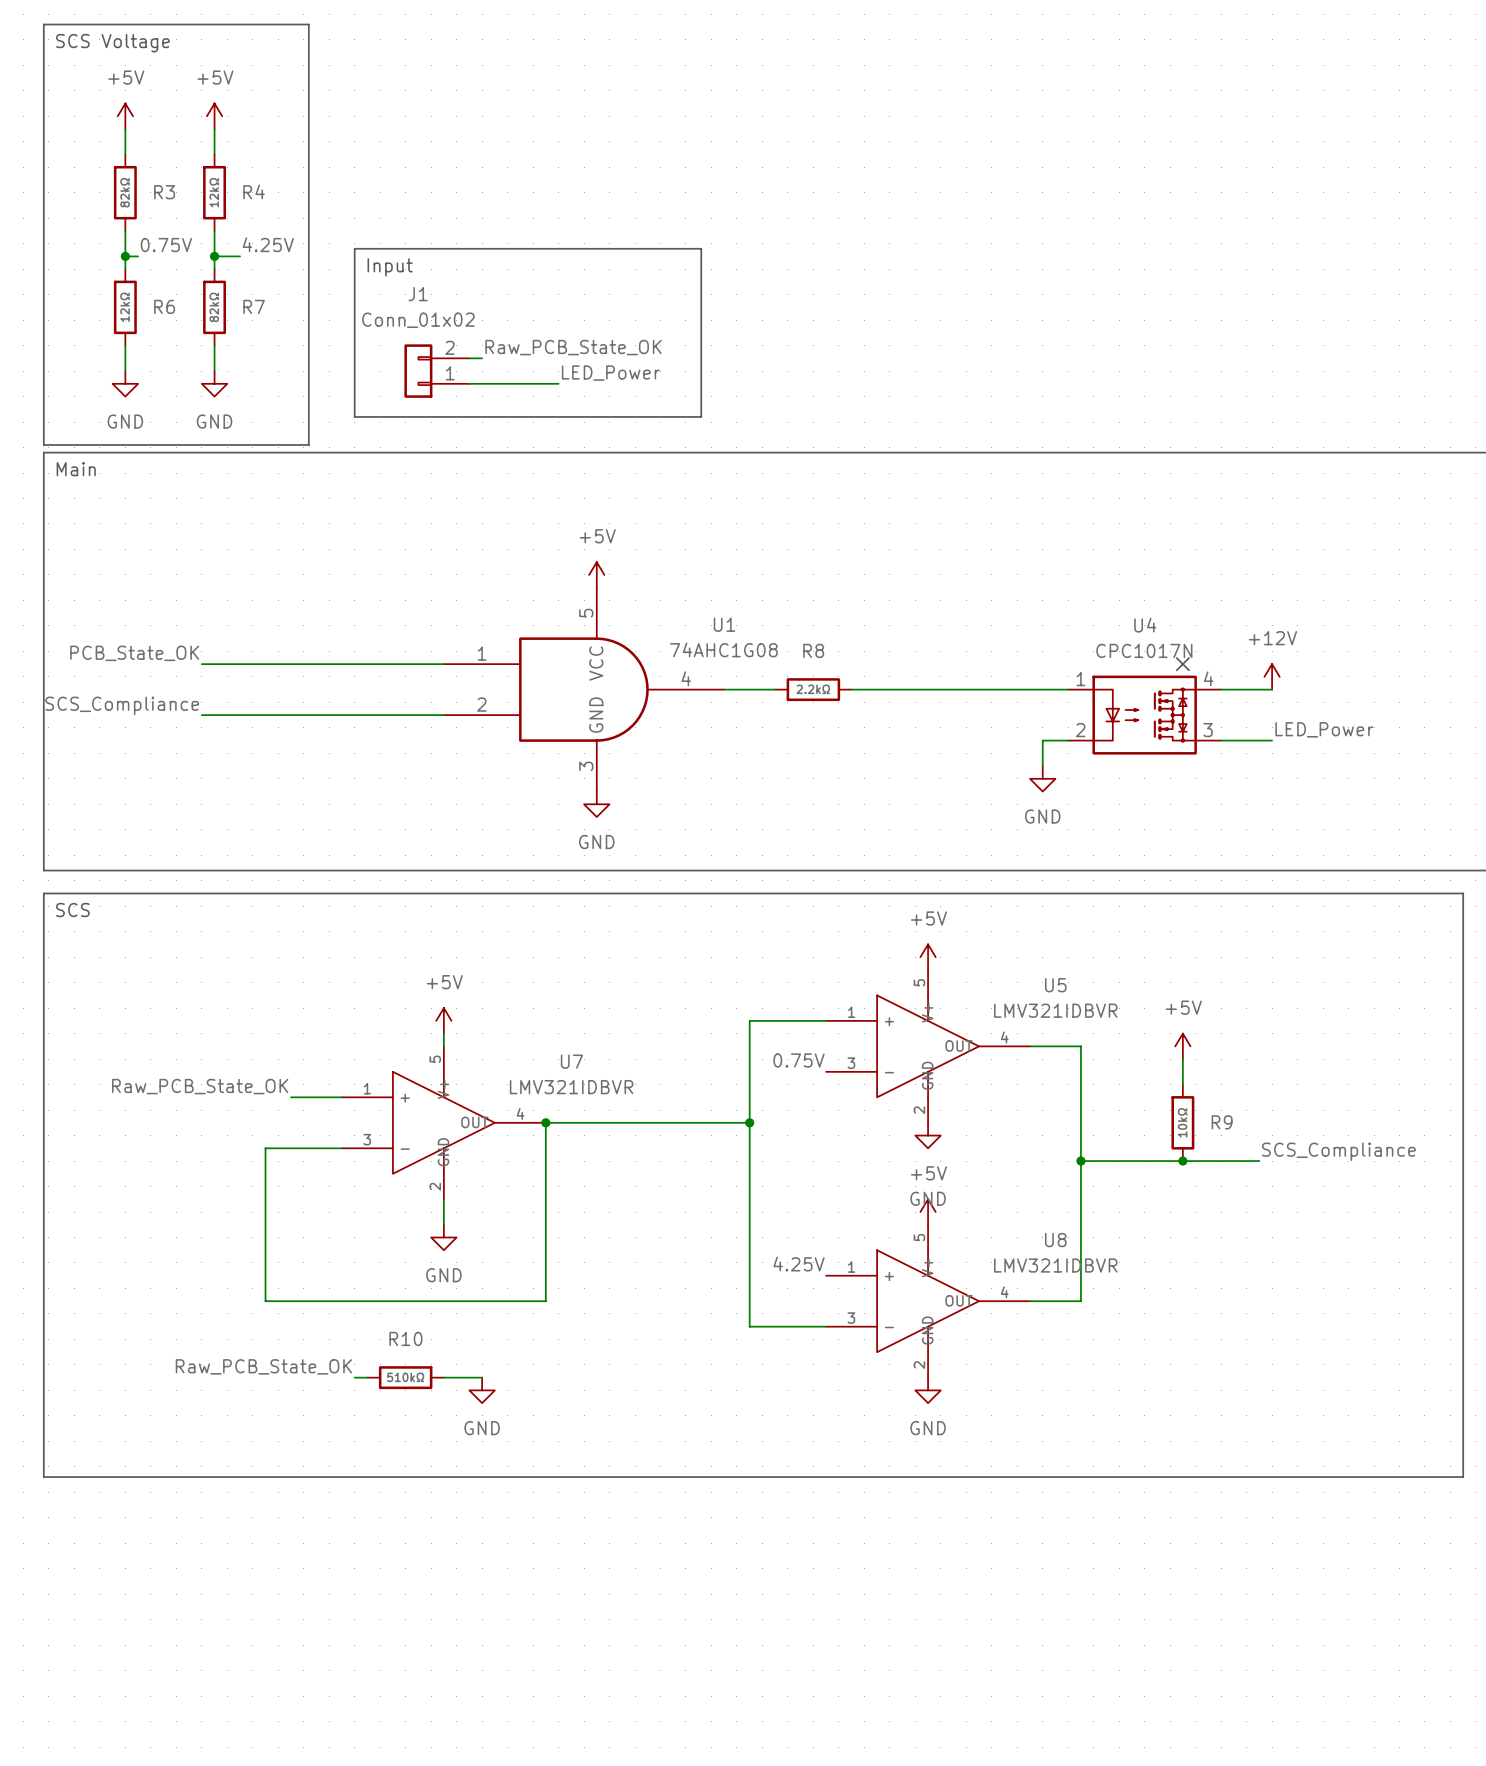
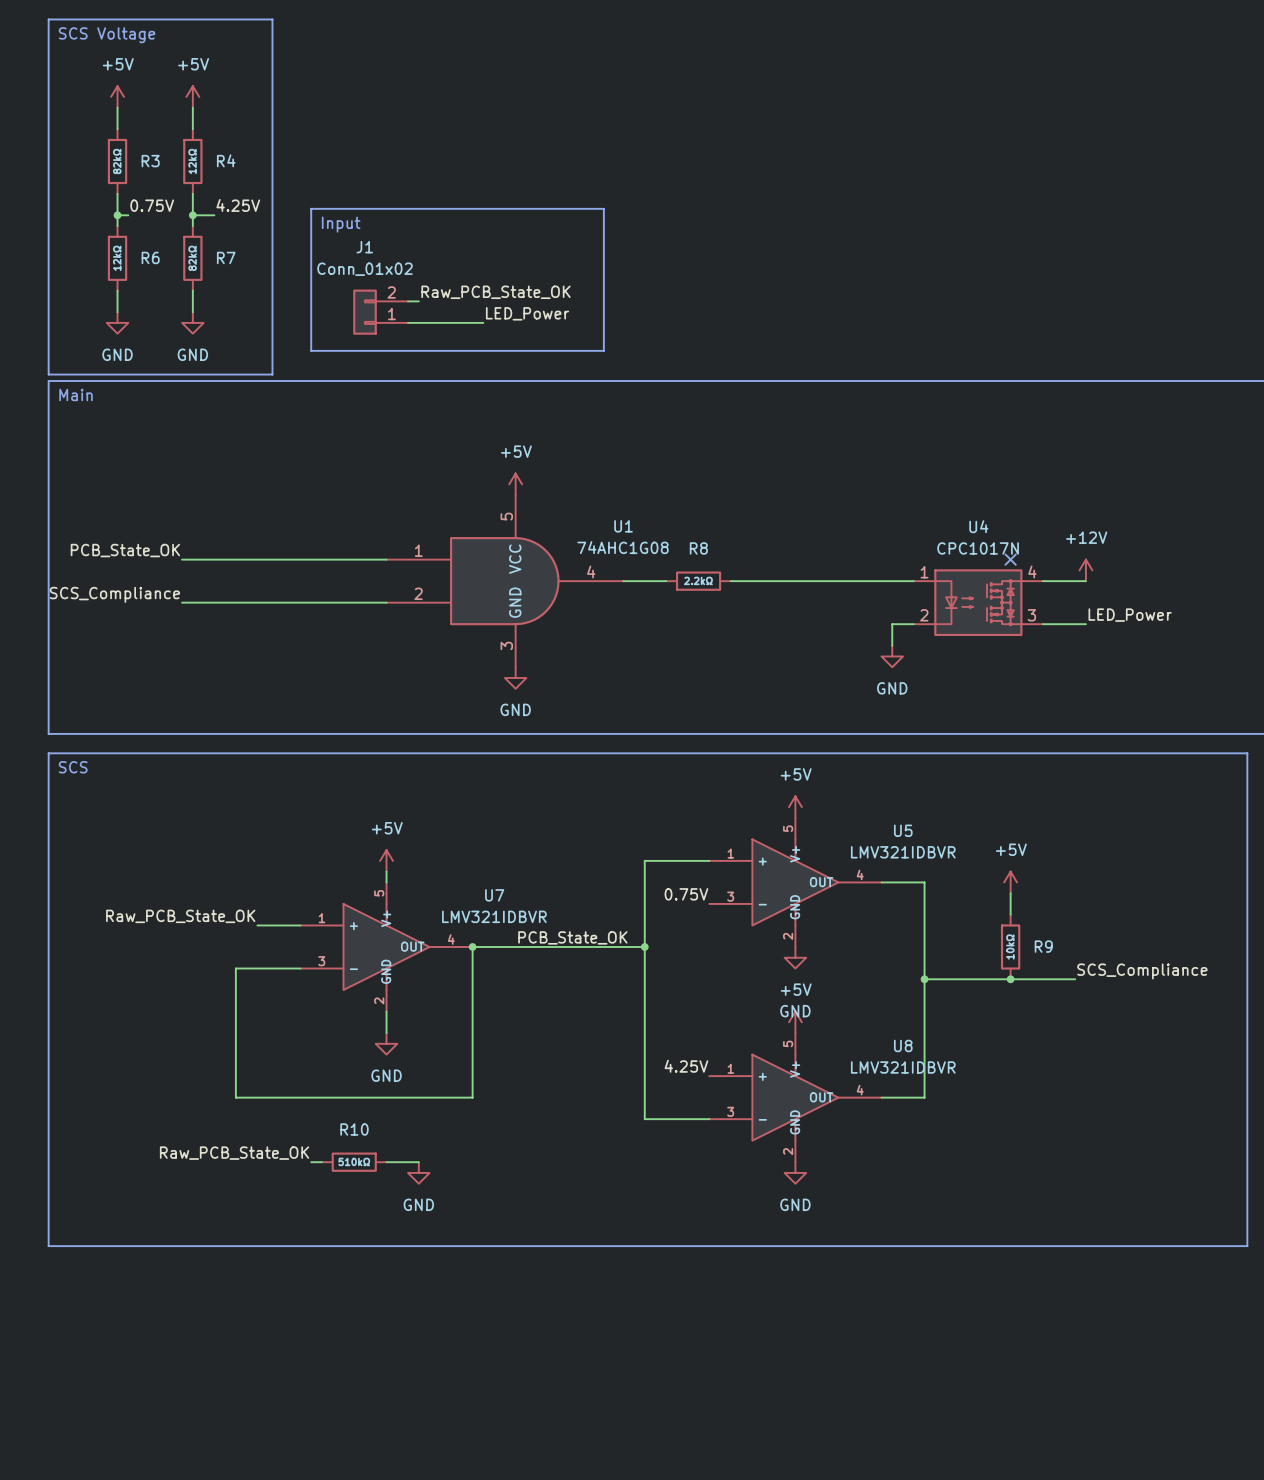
label: none -> PCB_State_OK (572, 937)

